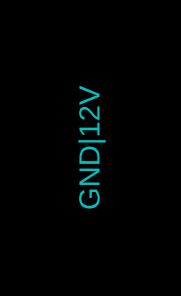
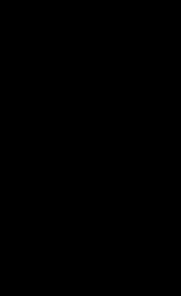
text: GND|12V (92, 147) -> none

